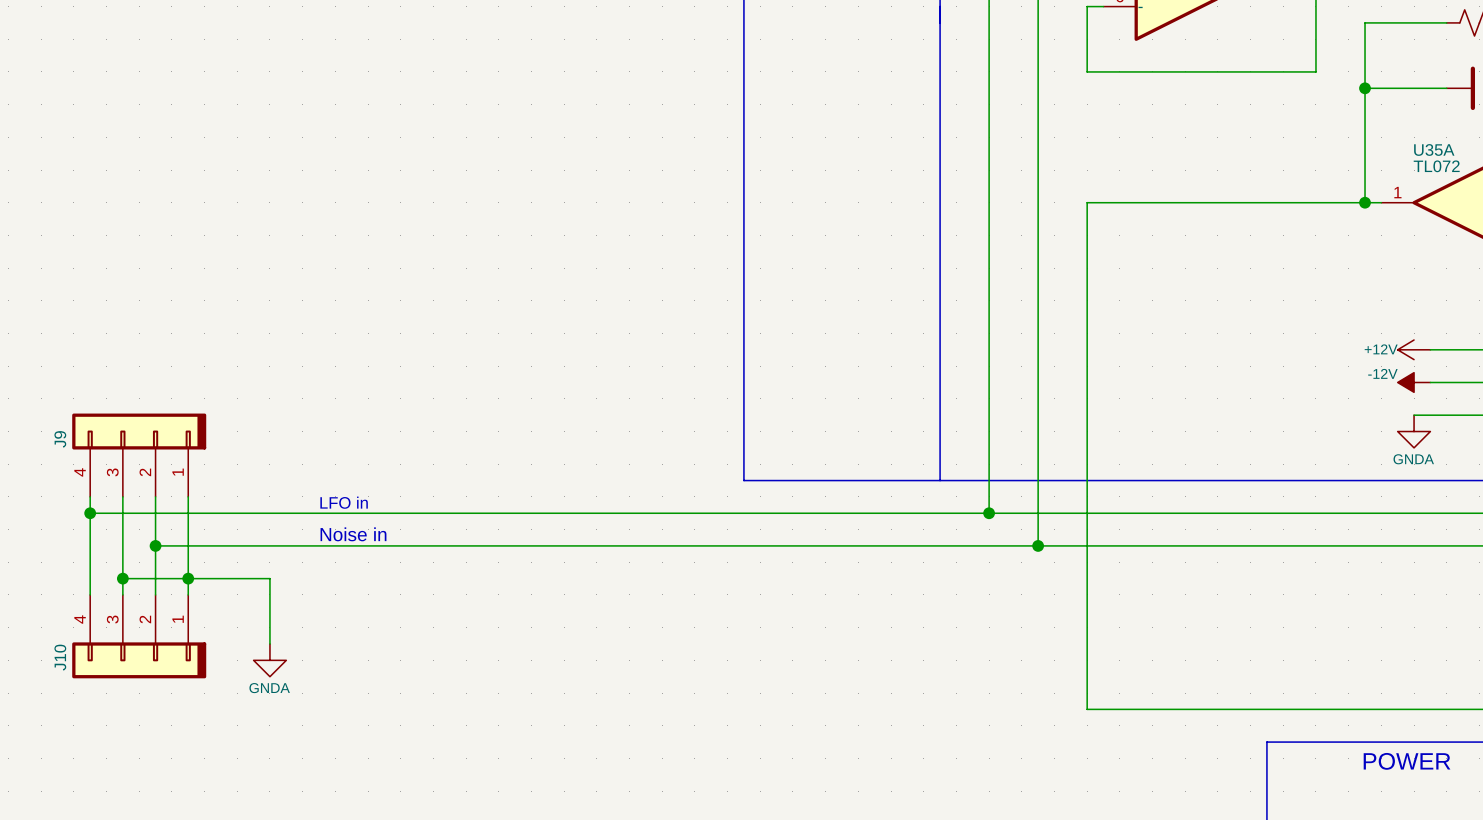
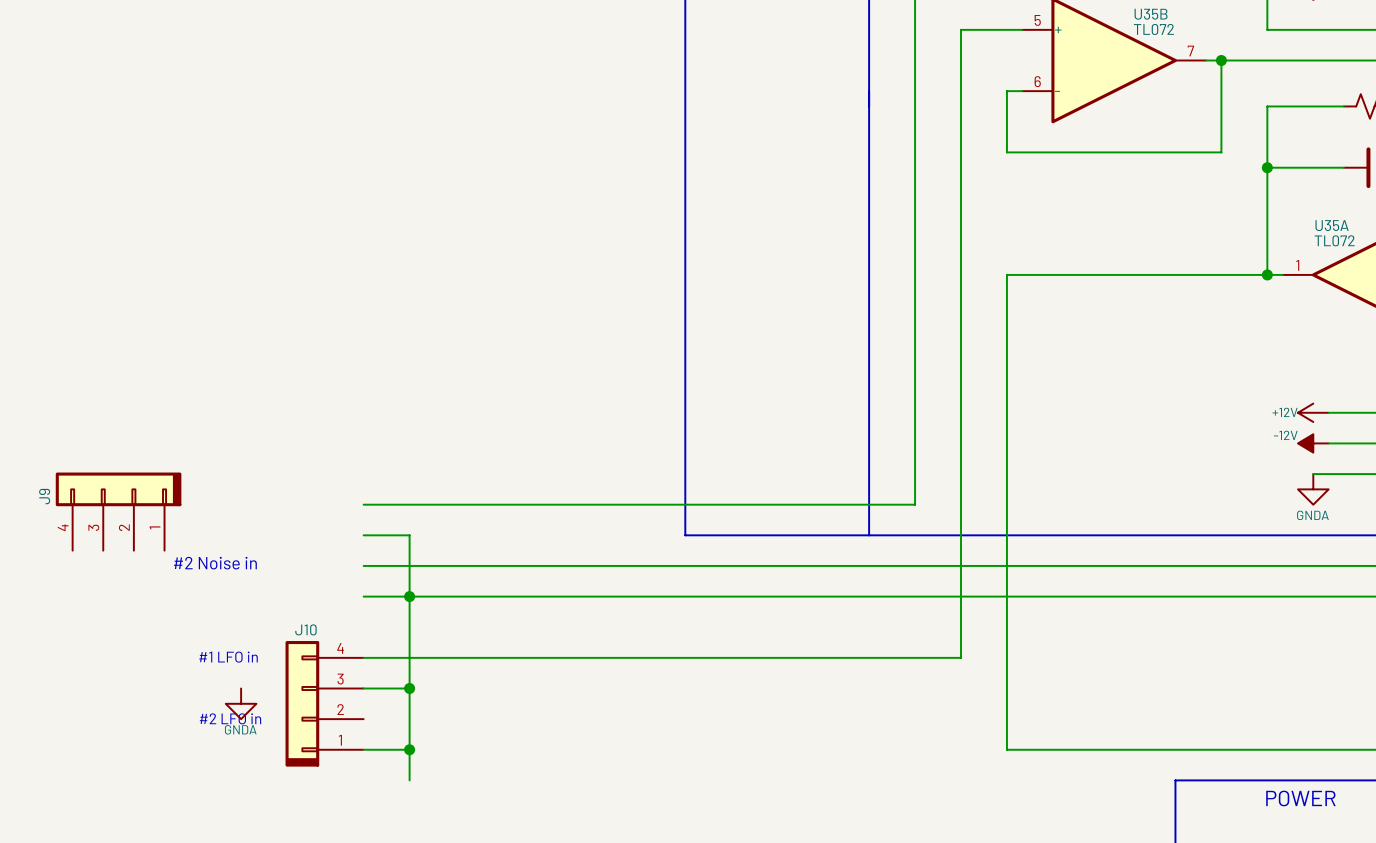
wire: (989, 447) (989, 513) -> (915, 504) (363, 504)
wire: none -> (363, 535) (409, 535) (409, 780)
wire: (90, 496) (90, 594) -> none
wire: (122, 496) (122, 594) -> none
wire: (155, 496) (155, 594) -> none
wire: (188, 496) (188, 594) -> none
text: LFO in (344, 502) -> none
wire: (90, 513) (400, 513) -> none
junction: (90, 513) -> none
junction: (989, 513) -> none
text: Noise in (353, 534) -> #2 Noise in (215, 563)
wire: (155, 545) (400, 545) -> none
junction: (155, 545) -> none
junction: none -> (409, 596)
wire: none -> (961, 596) (961, 657) (363, 657)
junction: (1038, 545) -> none
wire: (122, 578) (269, 578) (269, 644) -> none
junction: (122, 578) -> none
junction: (188, 578) -> none
text: none -> #1 LFO in (228, 657)
J10 position: (139, 636) -> (324, 703)
wire: none -> (363, 688) (409, 688)
junction: none -> (409, 688)
J10 rotation: 0° (139, 660) -> 90° clockwise (302, 703)
text: none -> #2 LFO in (230, 718)
wire: none -> (363, 749) (409, 749)
junction: none -> (409, 749)

